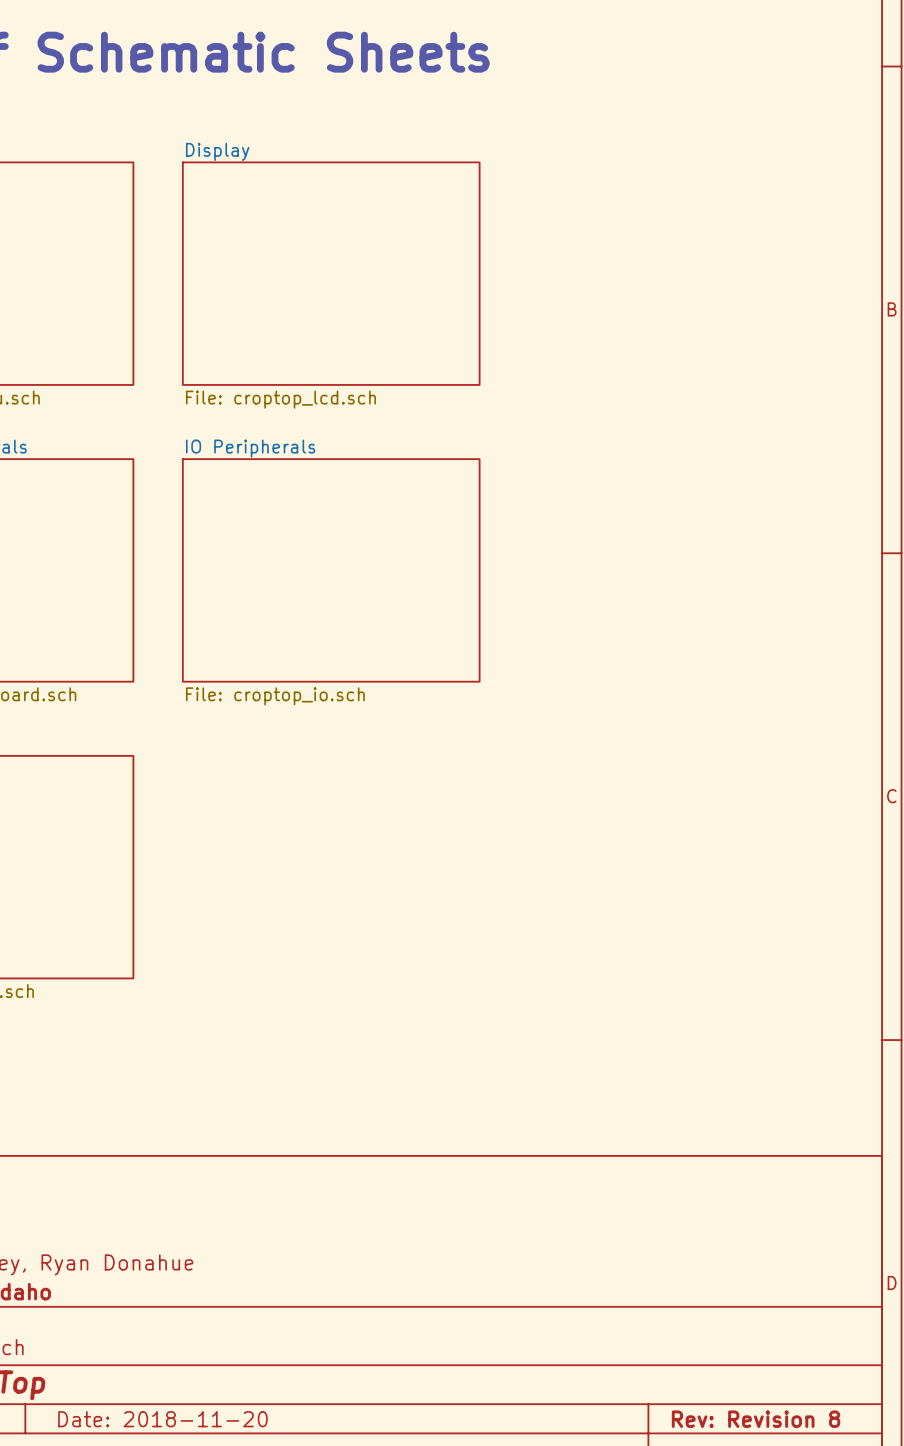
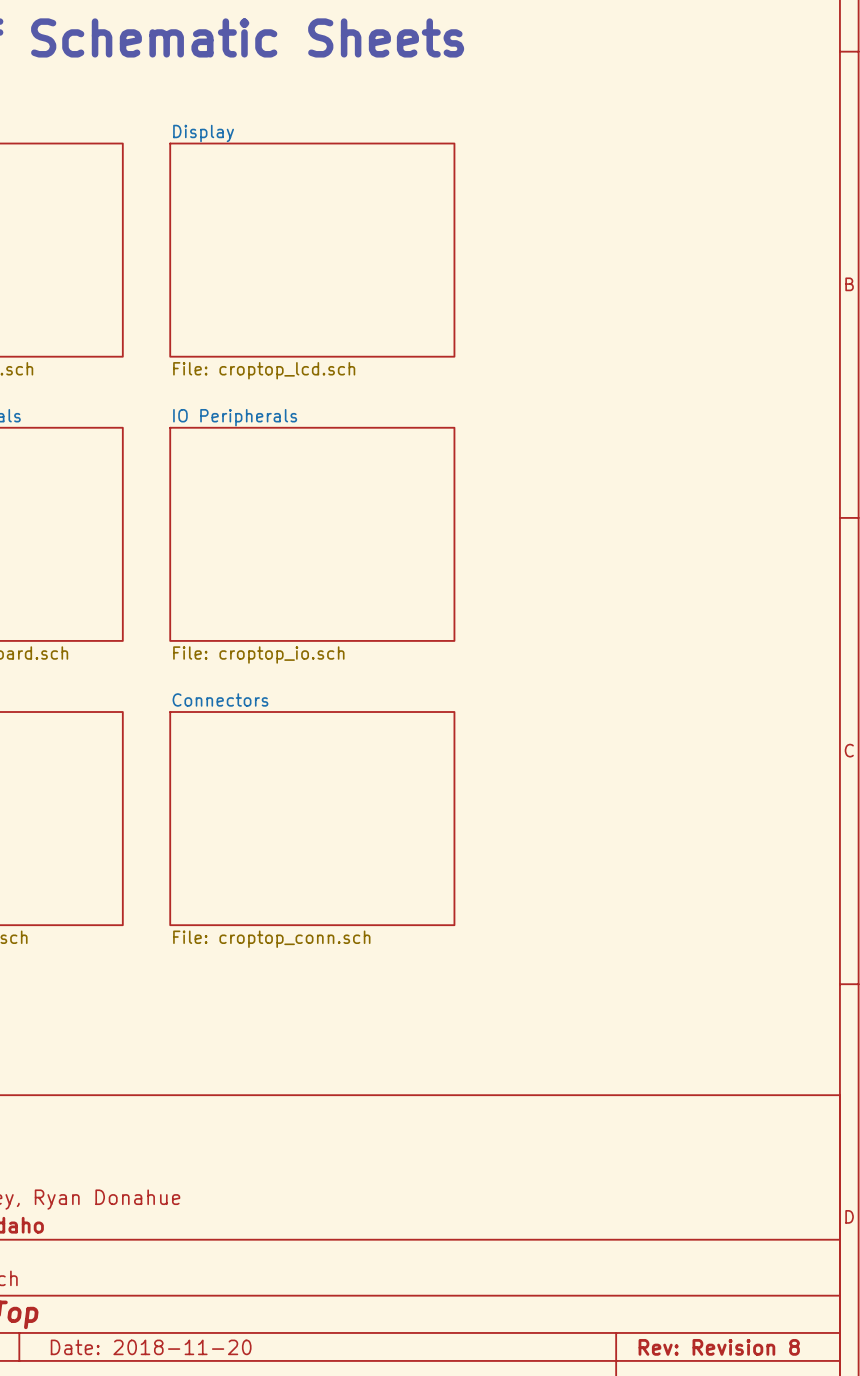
sheet Connectors: none -> File: croptop_conn.sch (312, 818)

